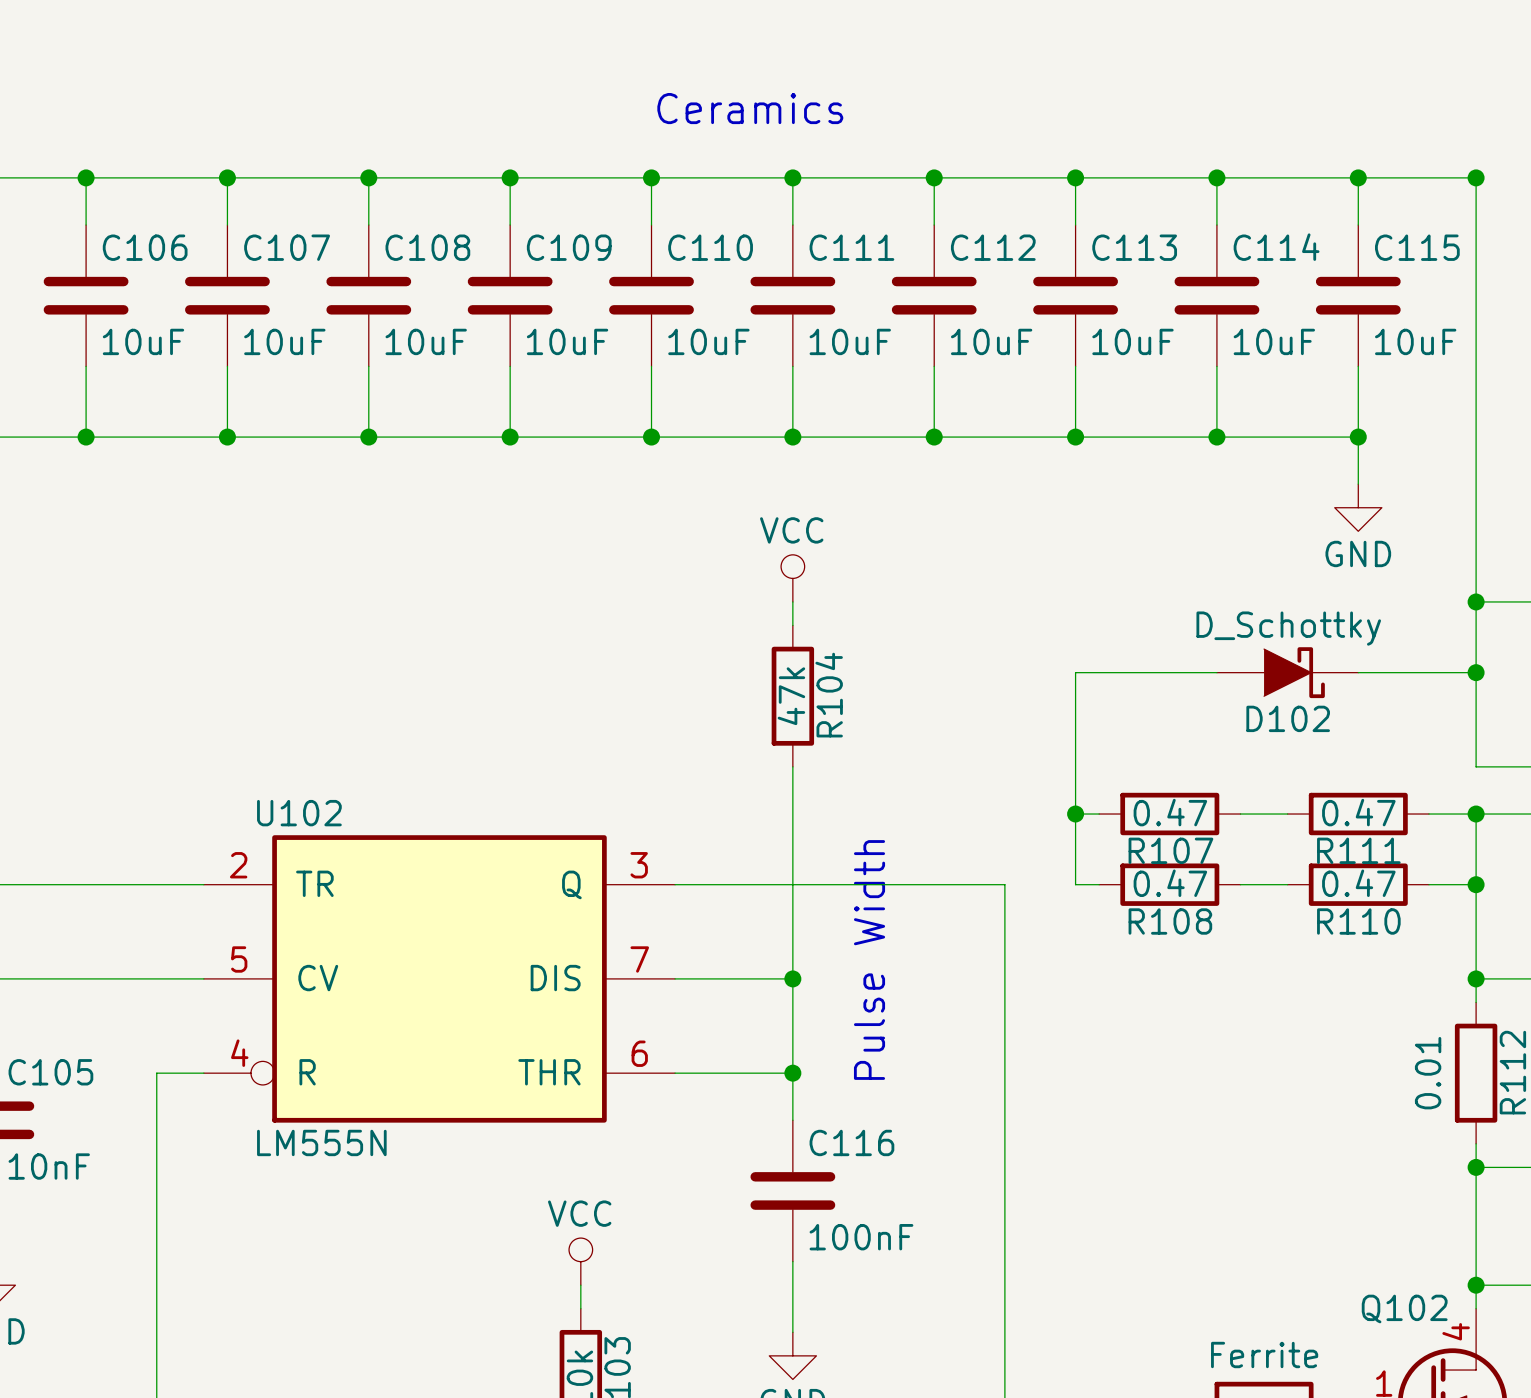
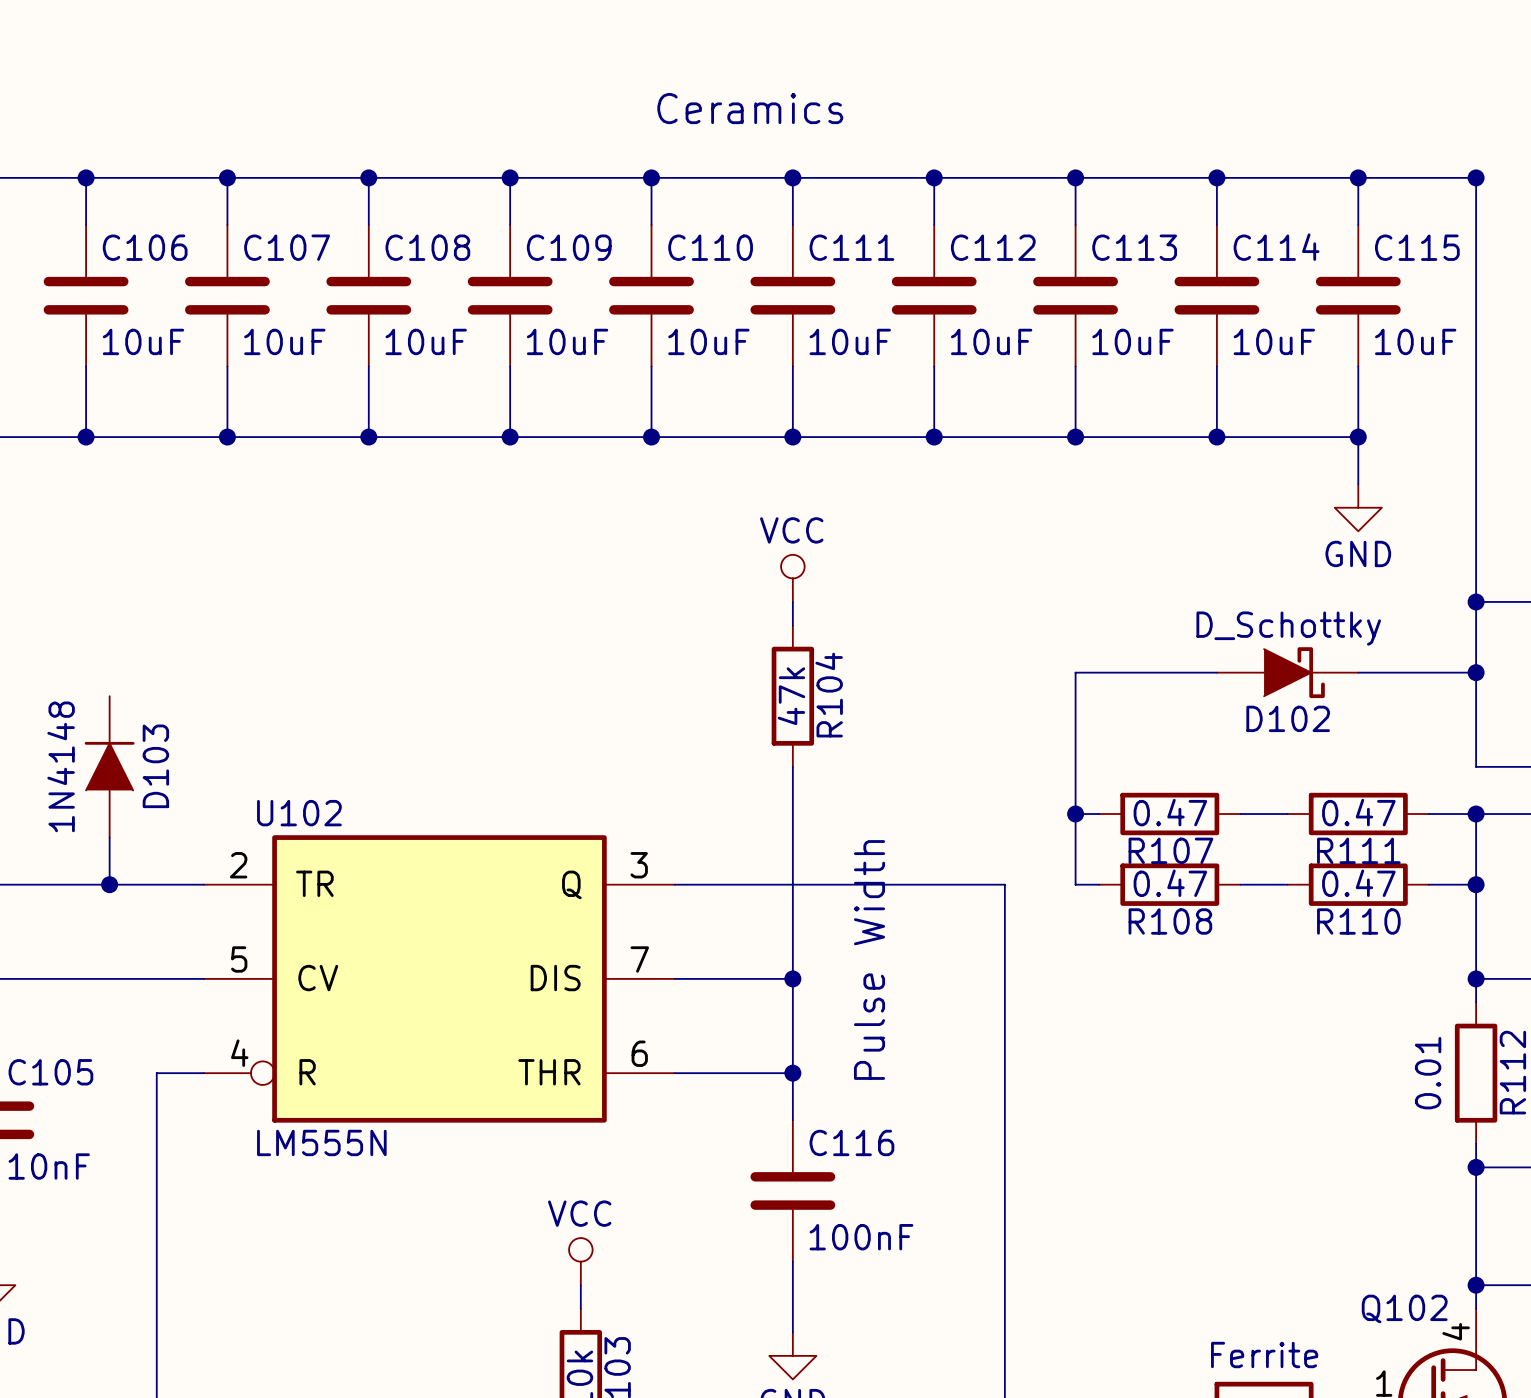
D103: none -> 1N4148 (109, 766)
wire: none -> (109, 837) (109, 884)
junction: none -> (109, 884)

